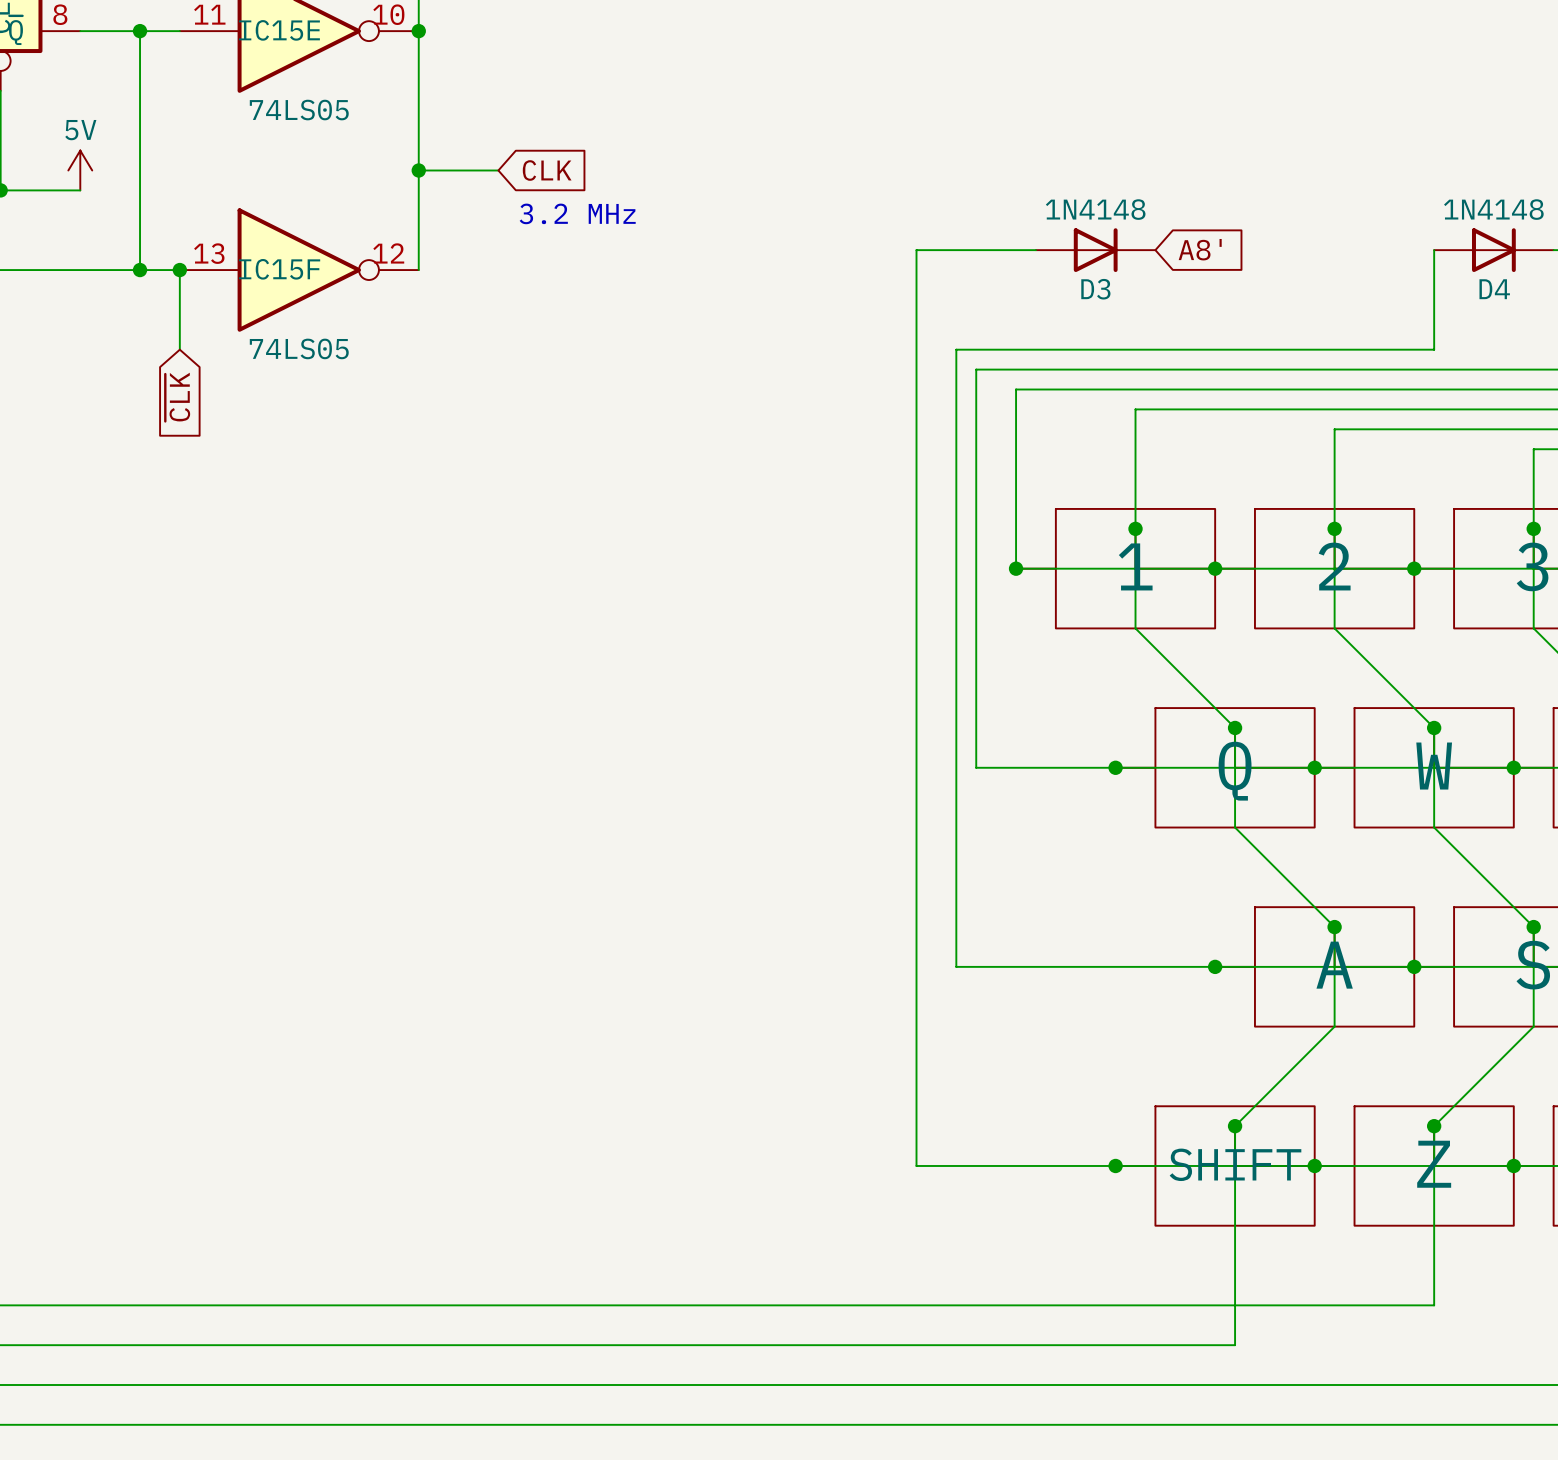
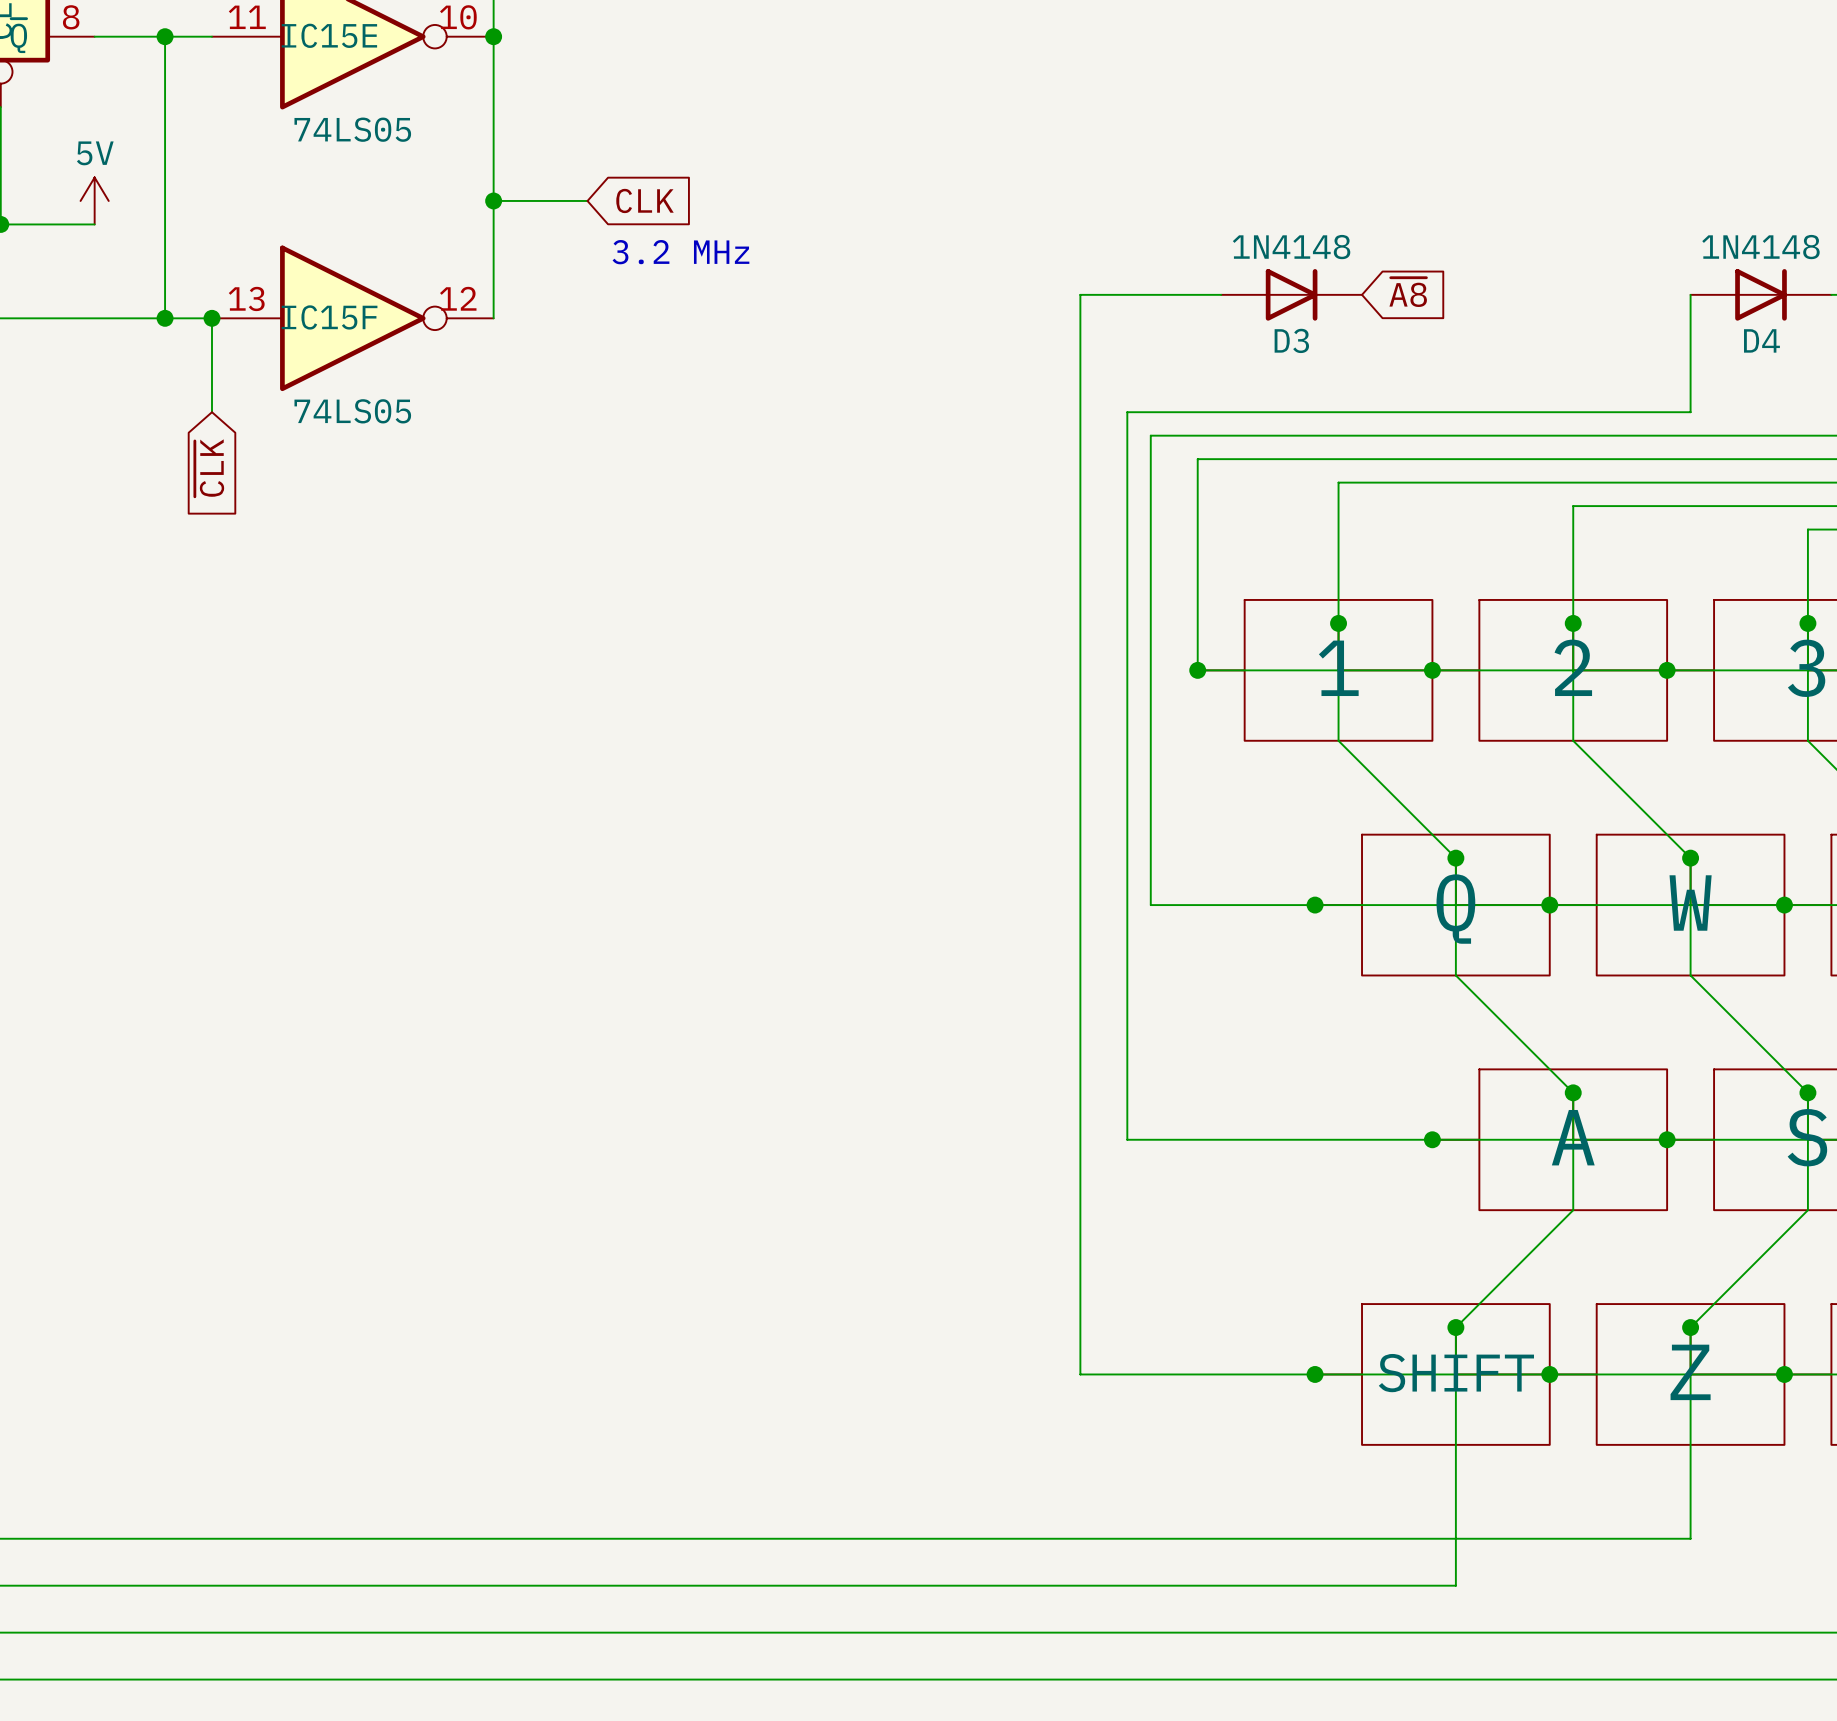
global label: A8' (1200, 249) -> ~{A8} (1408, 292)

